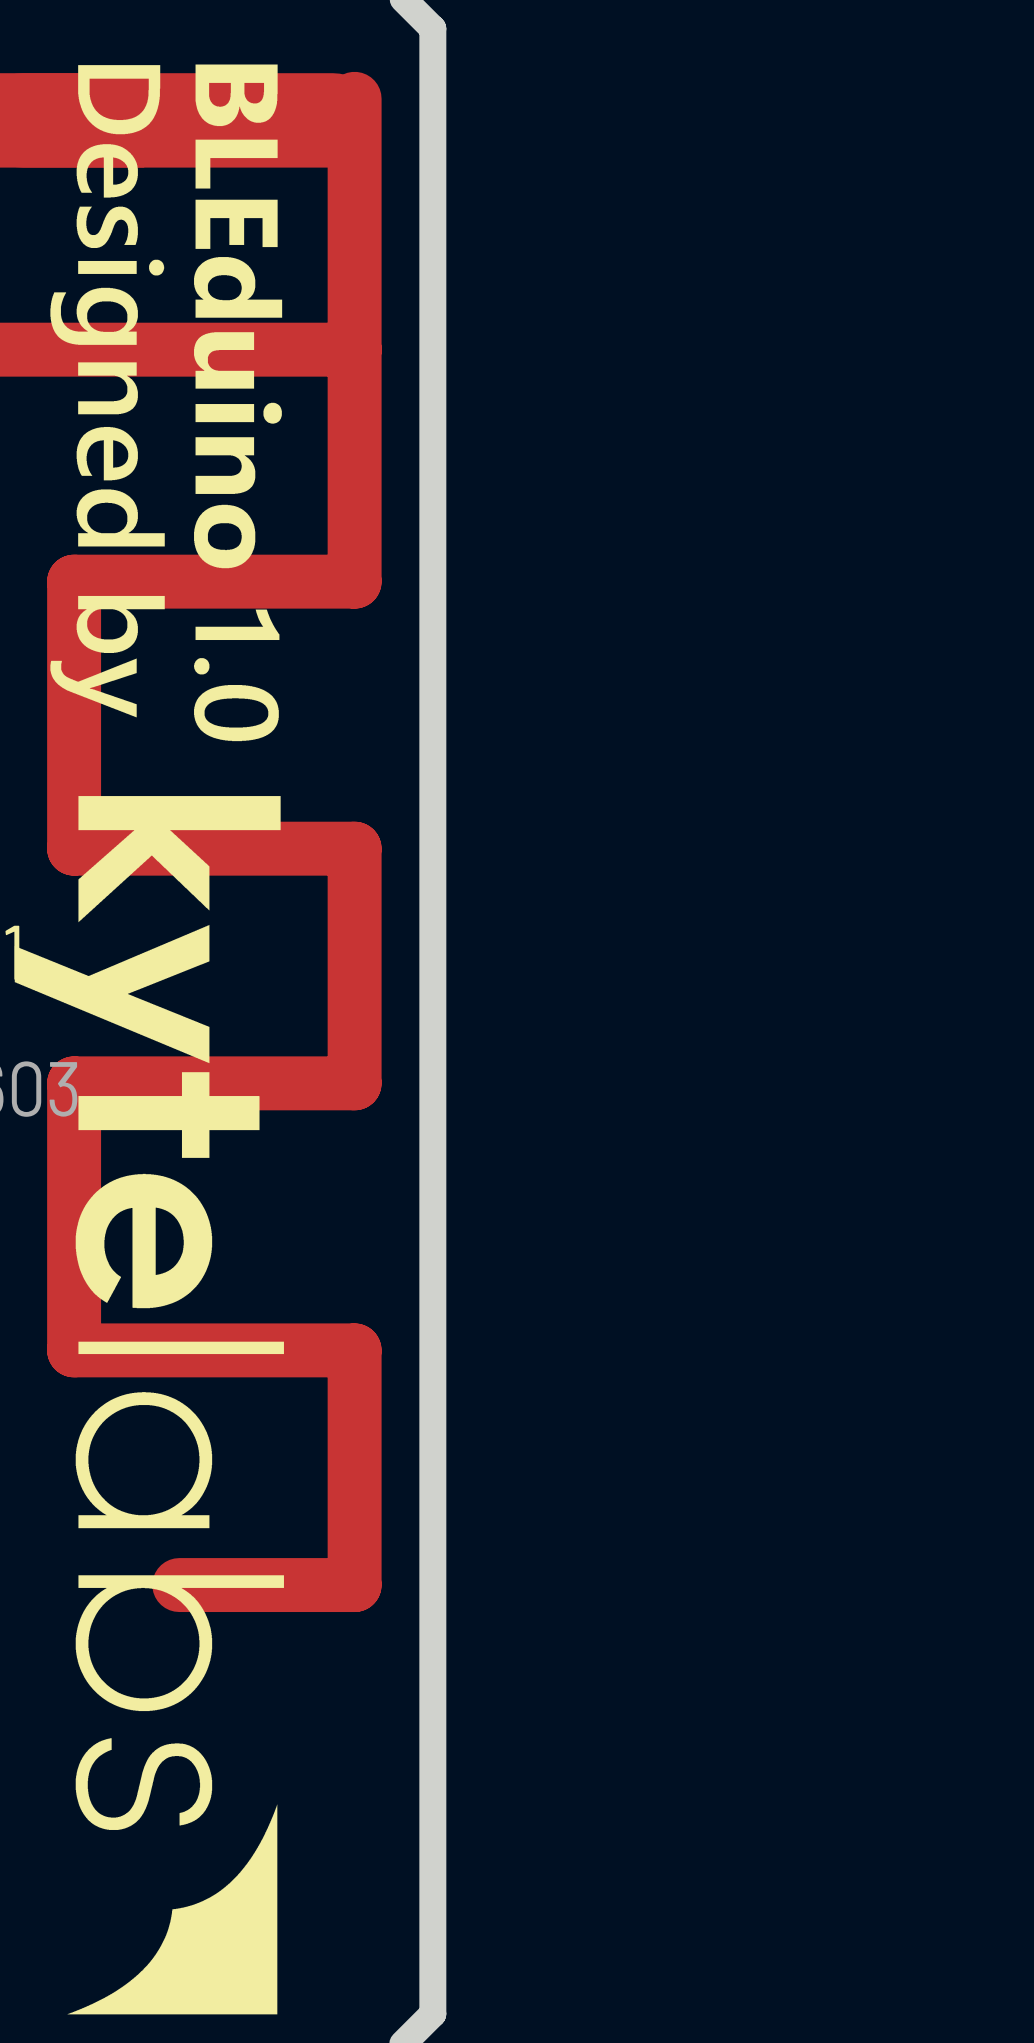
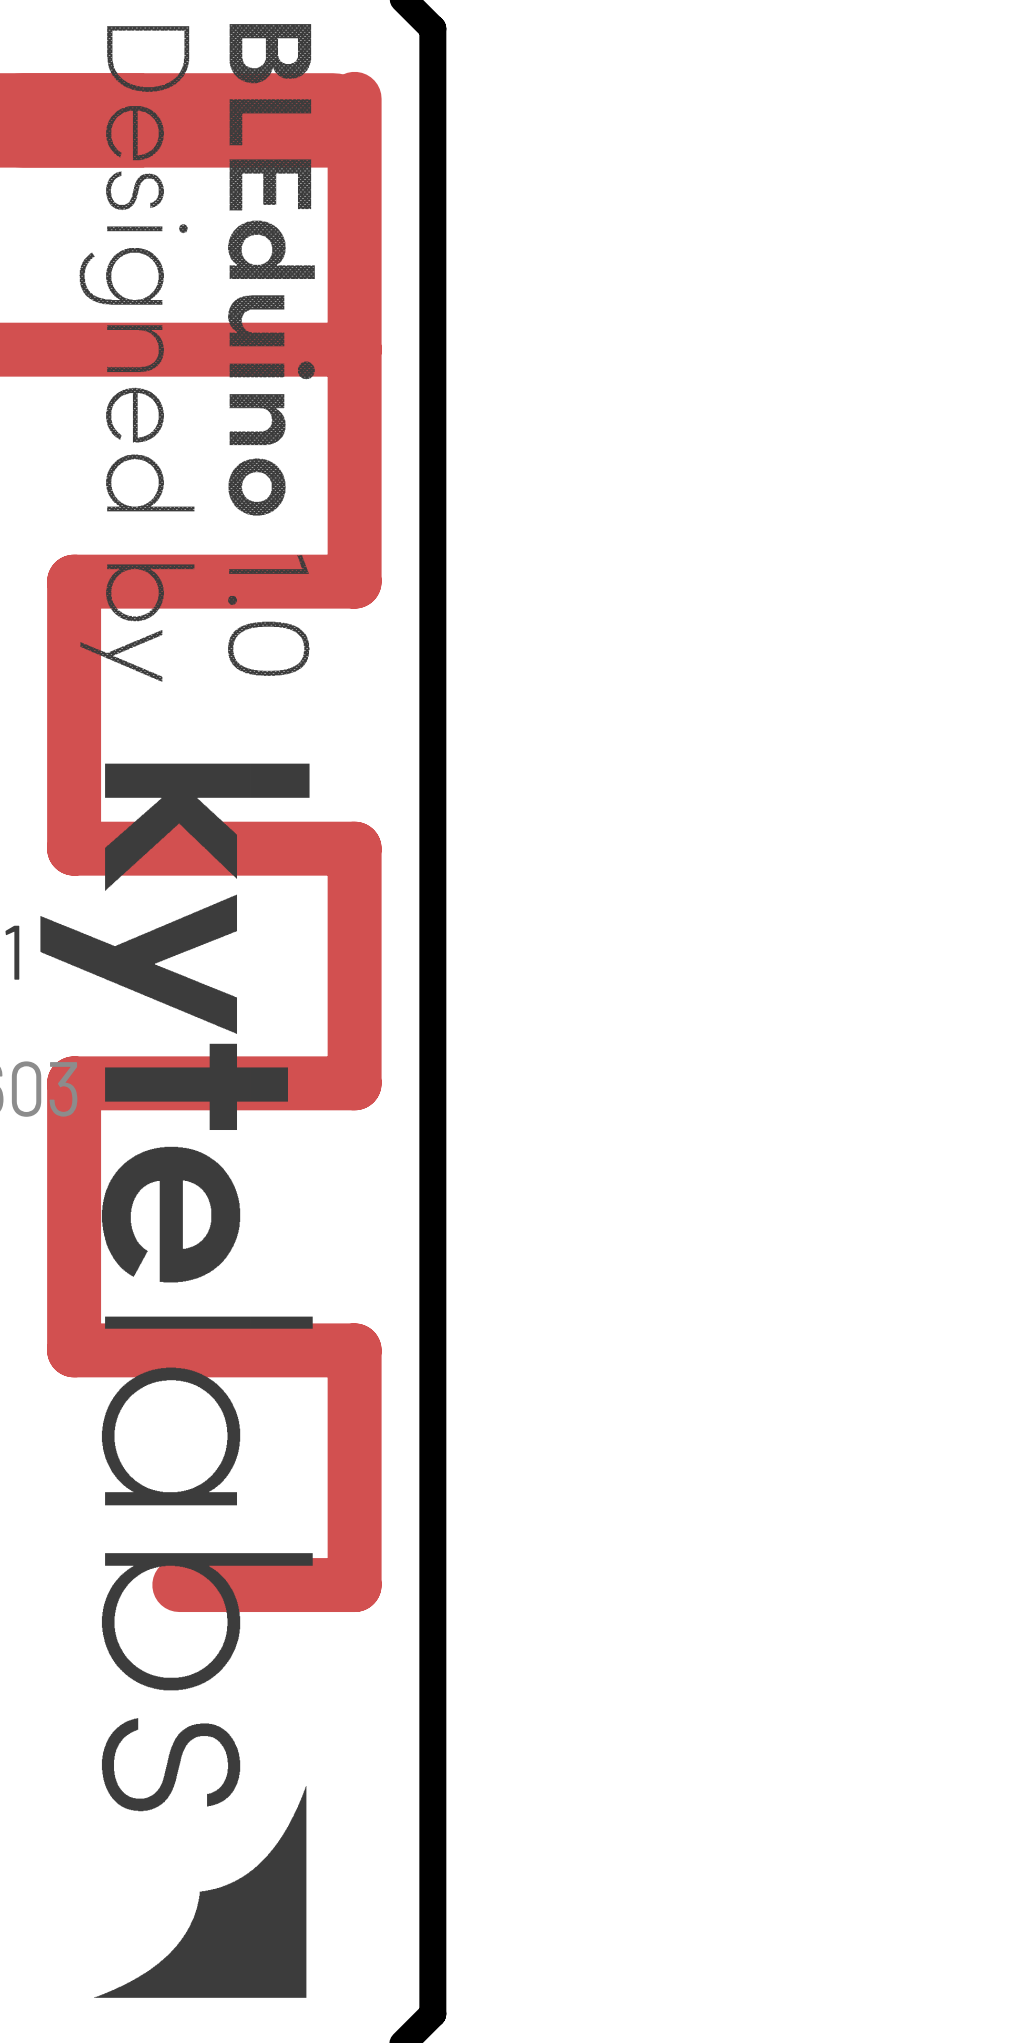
drawing shape: [14, 64, 284, 2015] -> [40, 24, 315, 1998]

